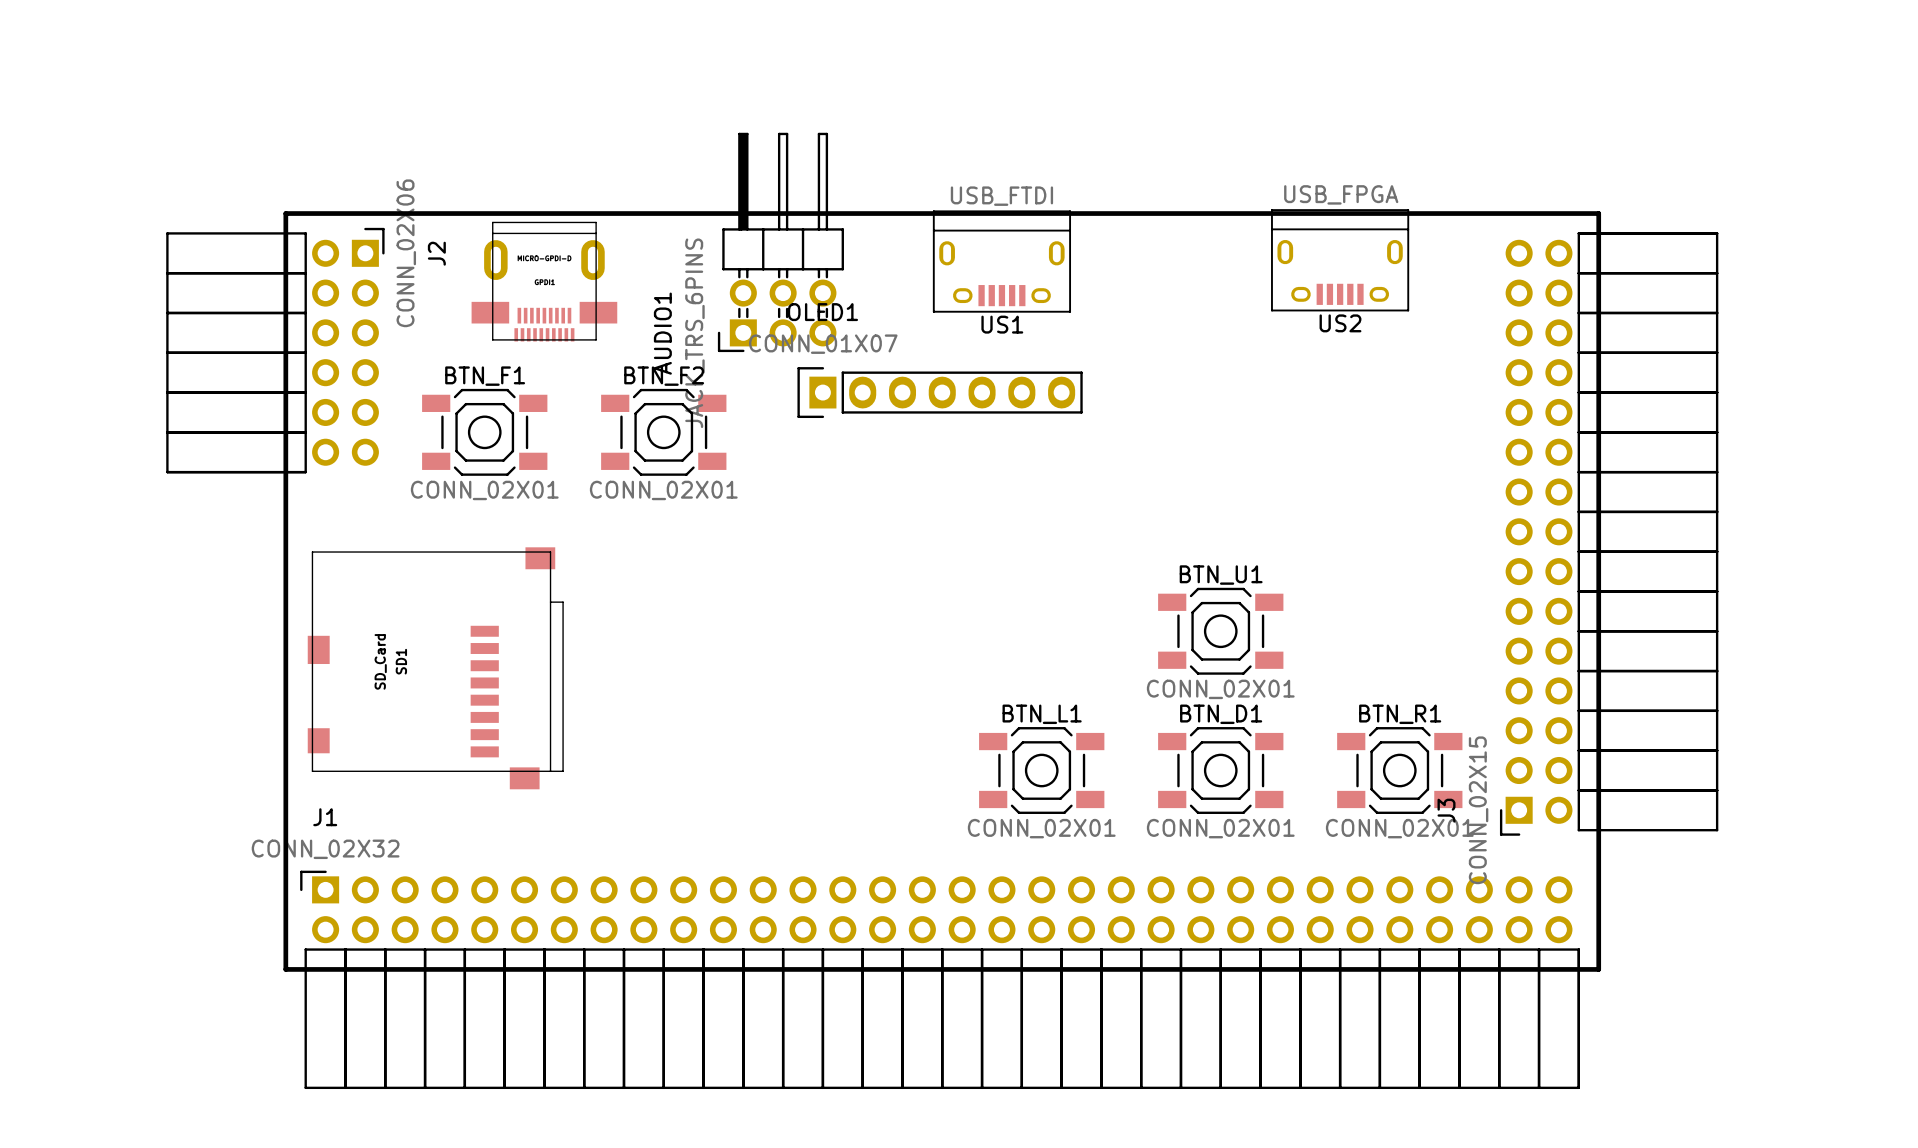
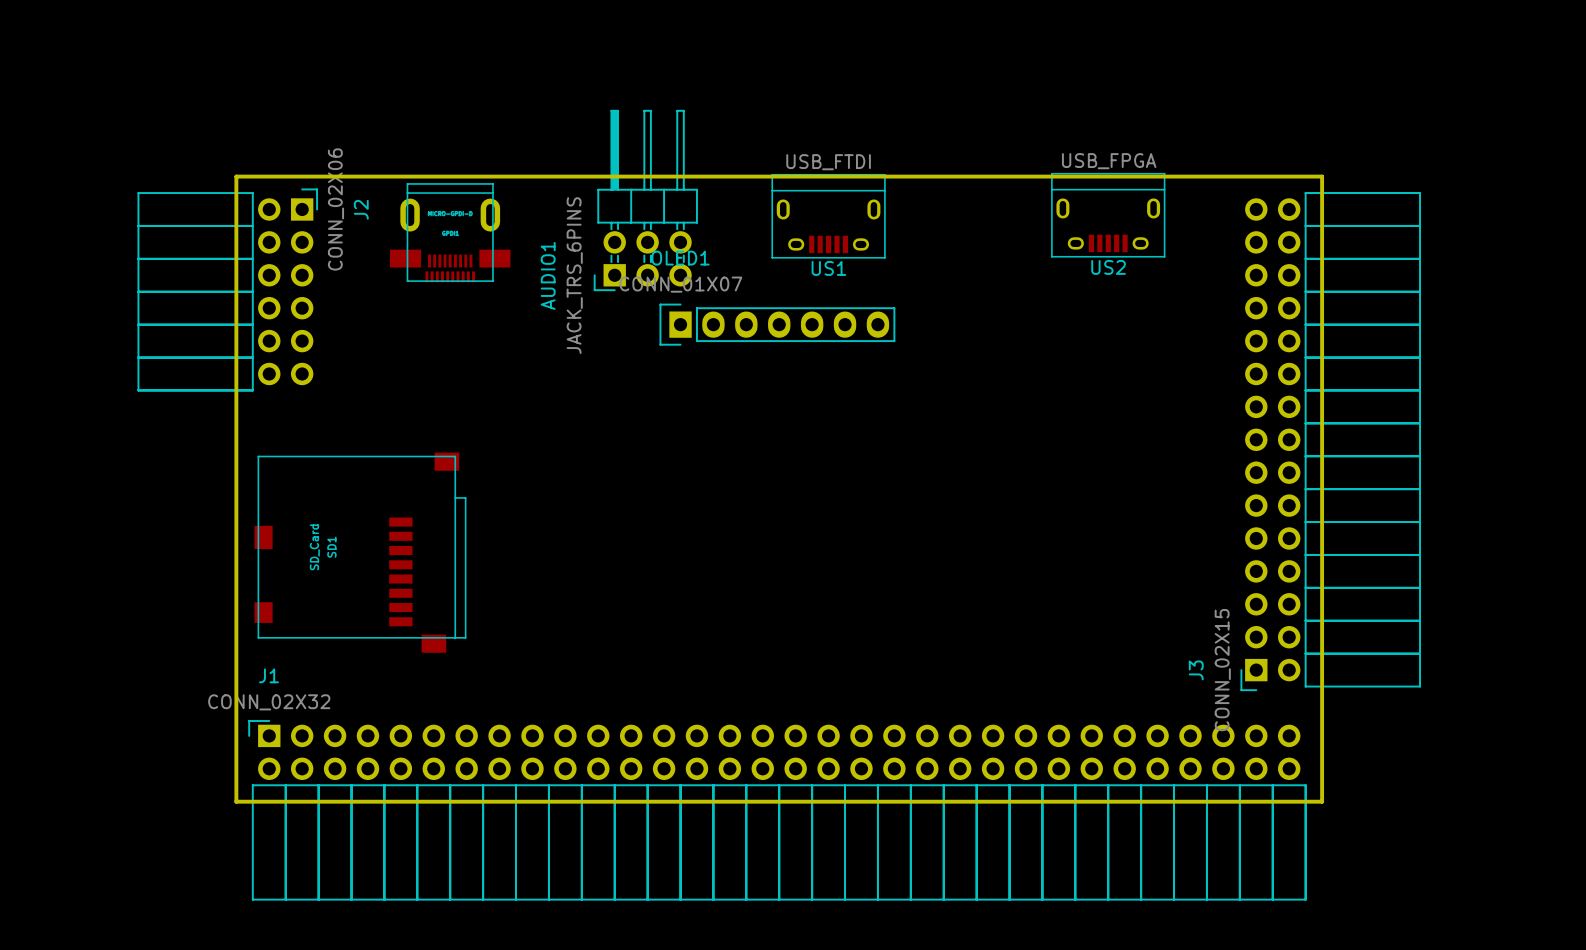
BTN_F1: CONN_02X01 (484, 432) -> none
BTN_F2: CONN_02X01 (663, 432) -> none
BTN_U1: CONN_02X01 (1220, 631) -> none
BTN_L1: CONN_02X01 (1041, 770) -> none
BTN_D1: CONN_02X01 (1220, 770) -> none
BTN_R1: CONN_02X01 (1399, 770) -> none

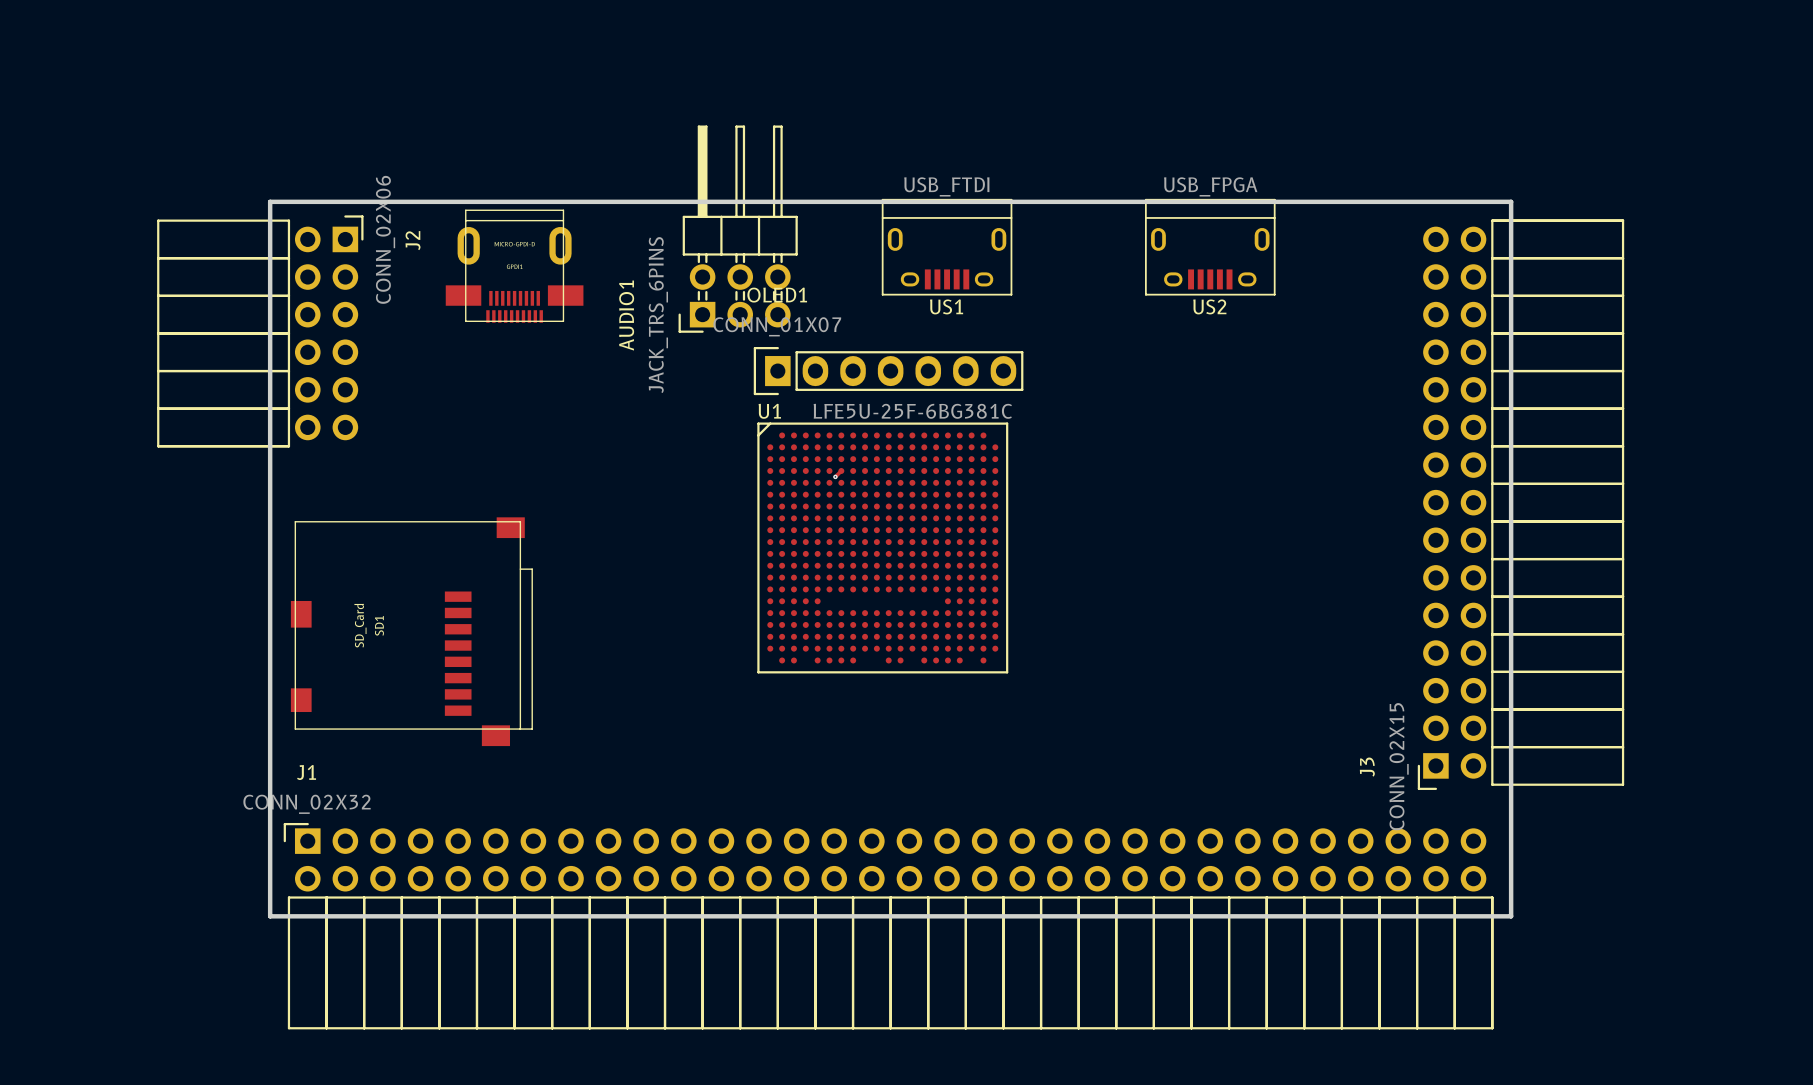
US2 position: (1108, 215) -> (1210, 247)
track: none -> (841, 470) (835, 476)
via: none -> (835, 476)
U1: none -> LFE5U-25F-6BG381C (882, 547)

